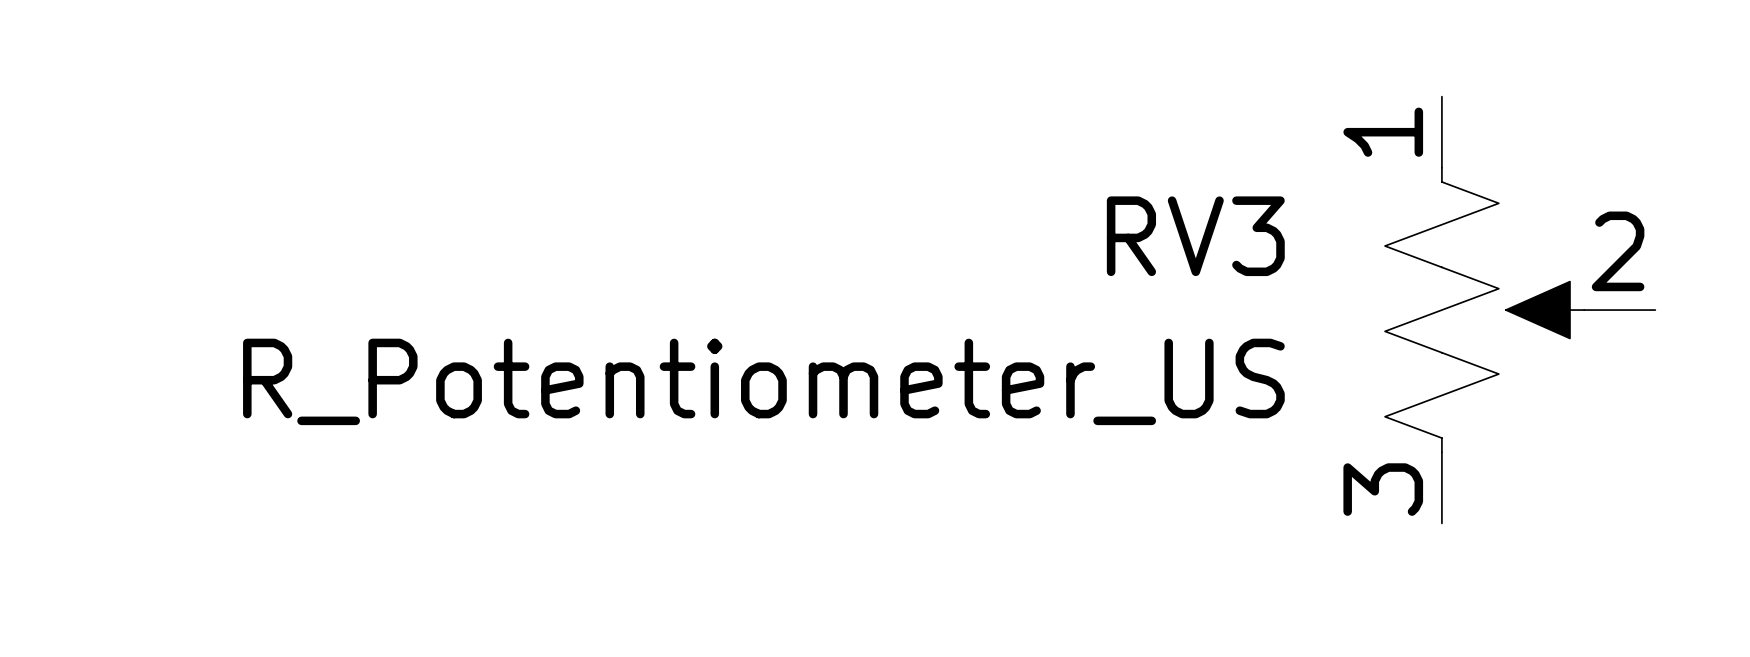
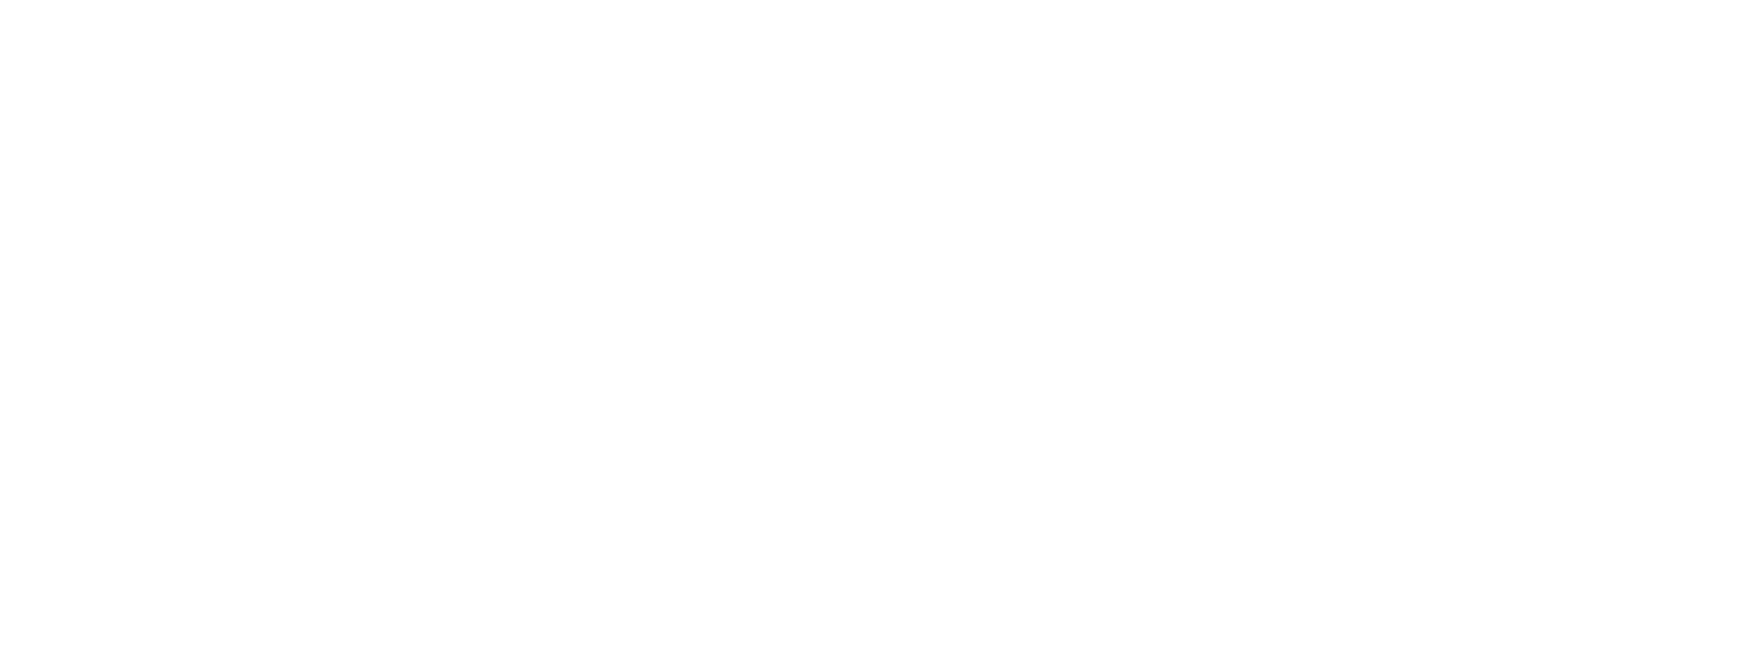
RV3: R_Potentiometer_US (1520, 310) -> none

